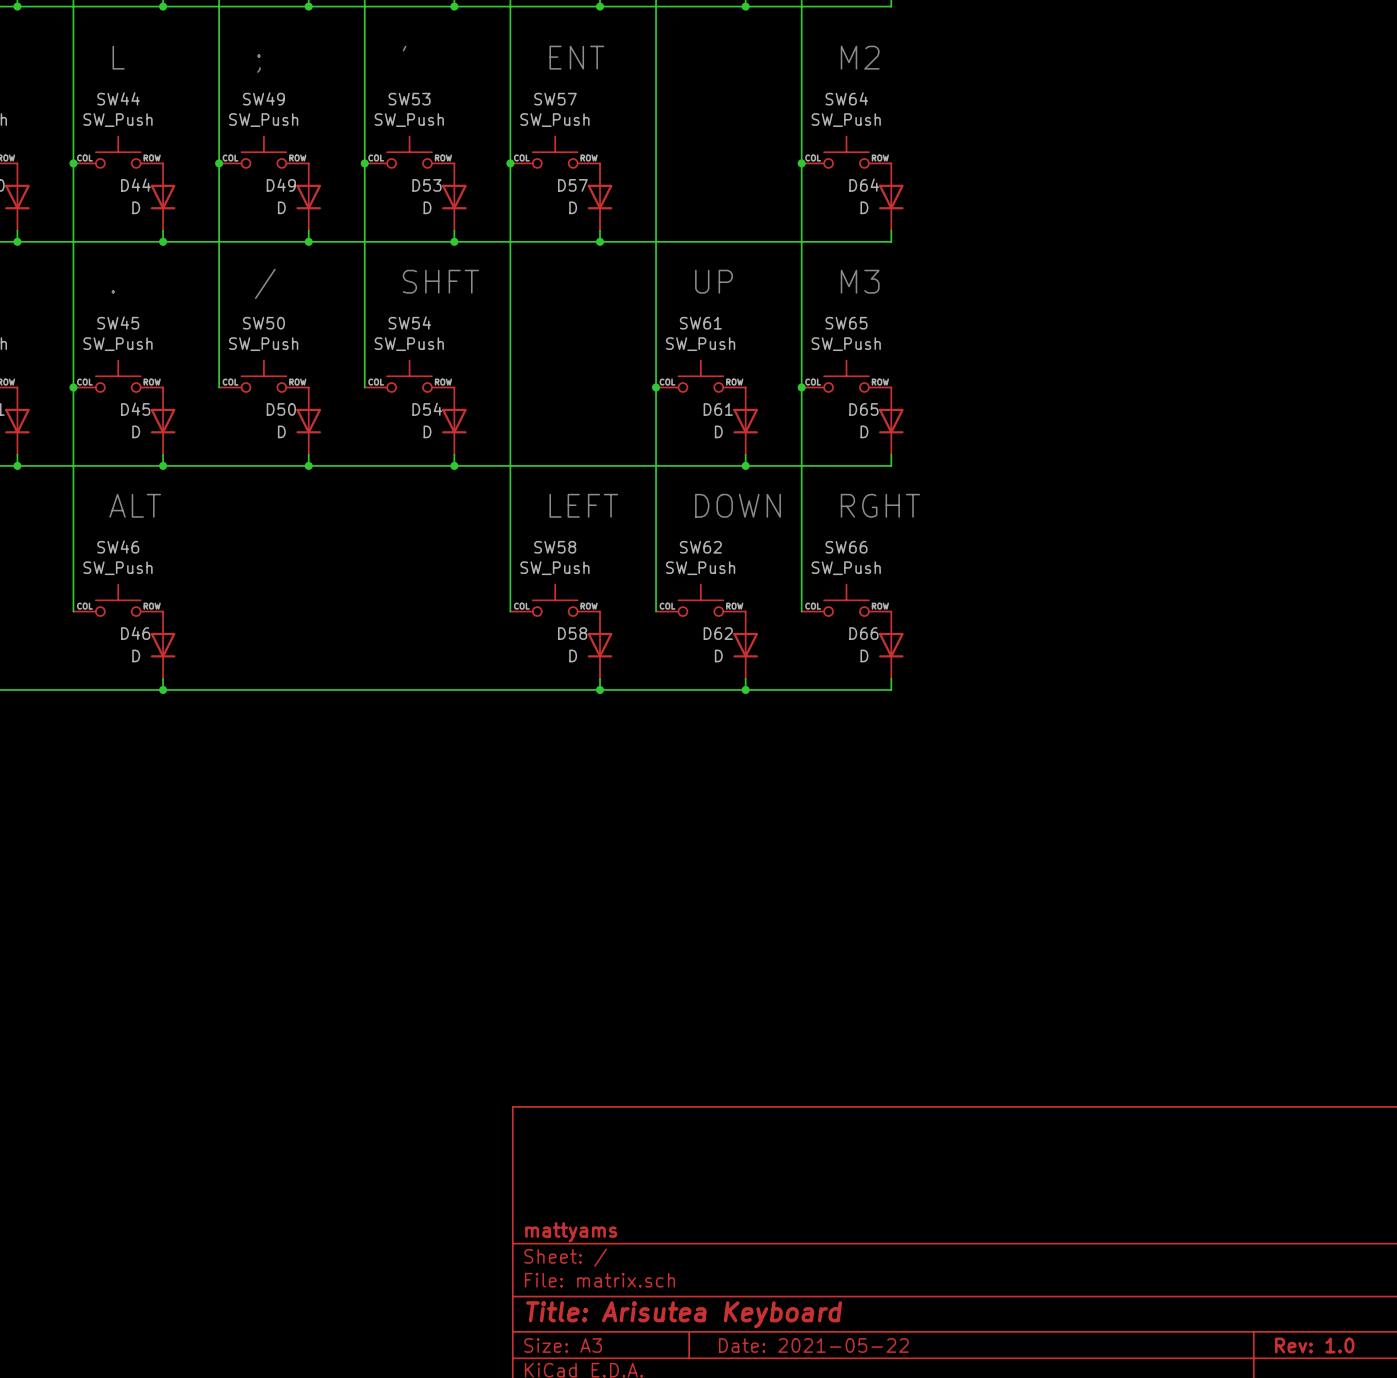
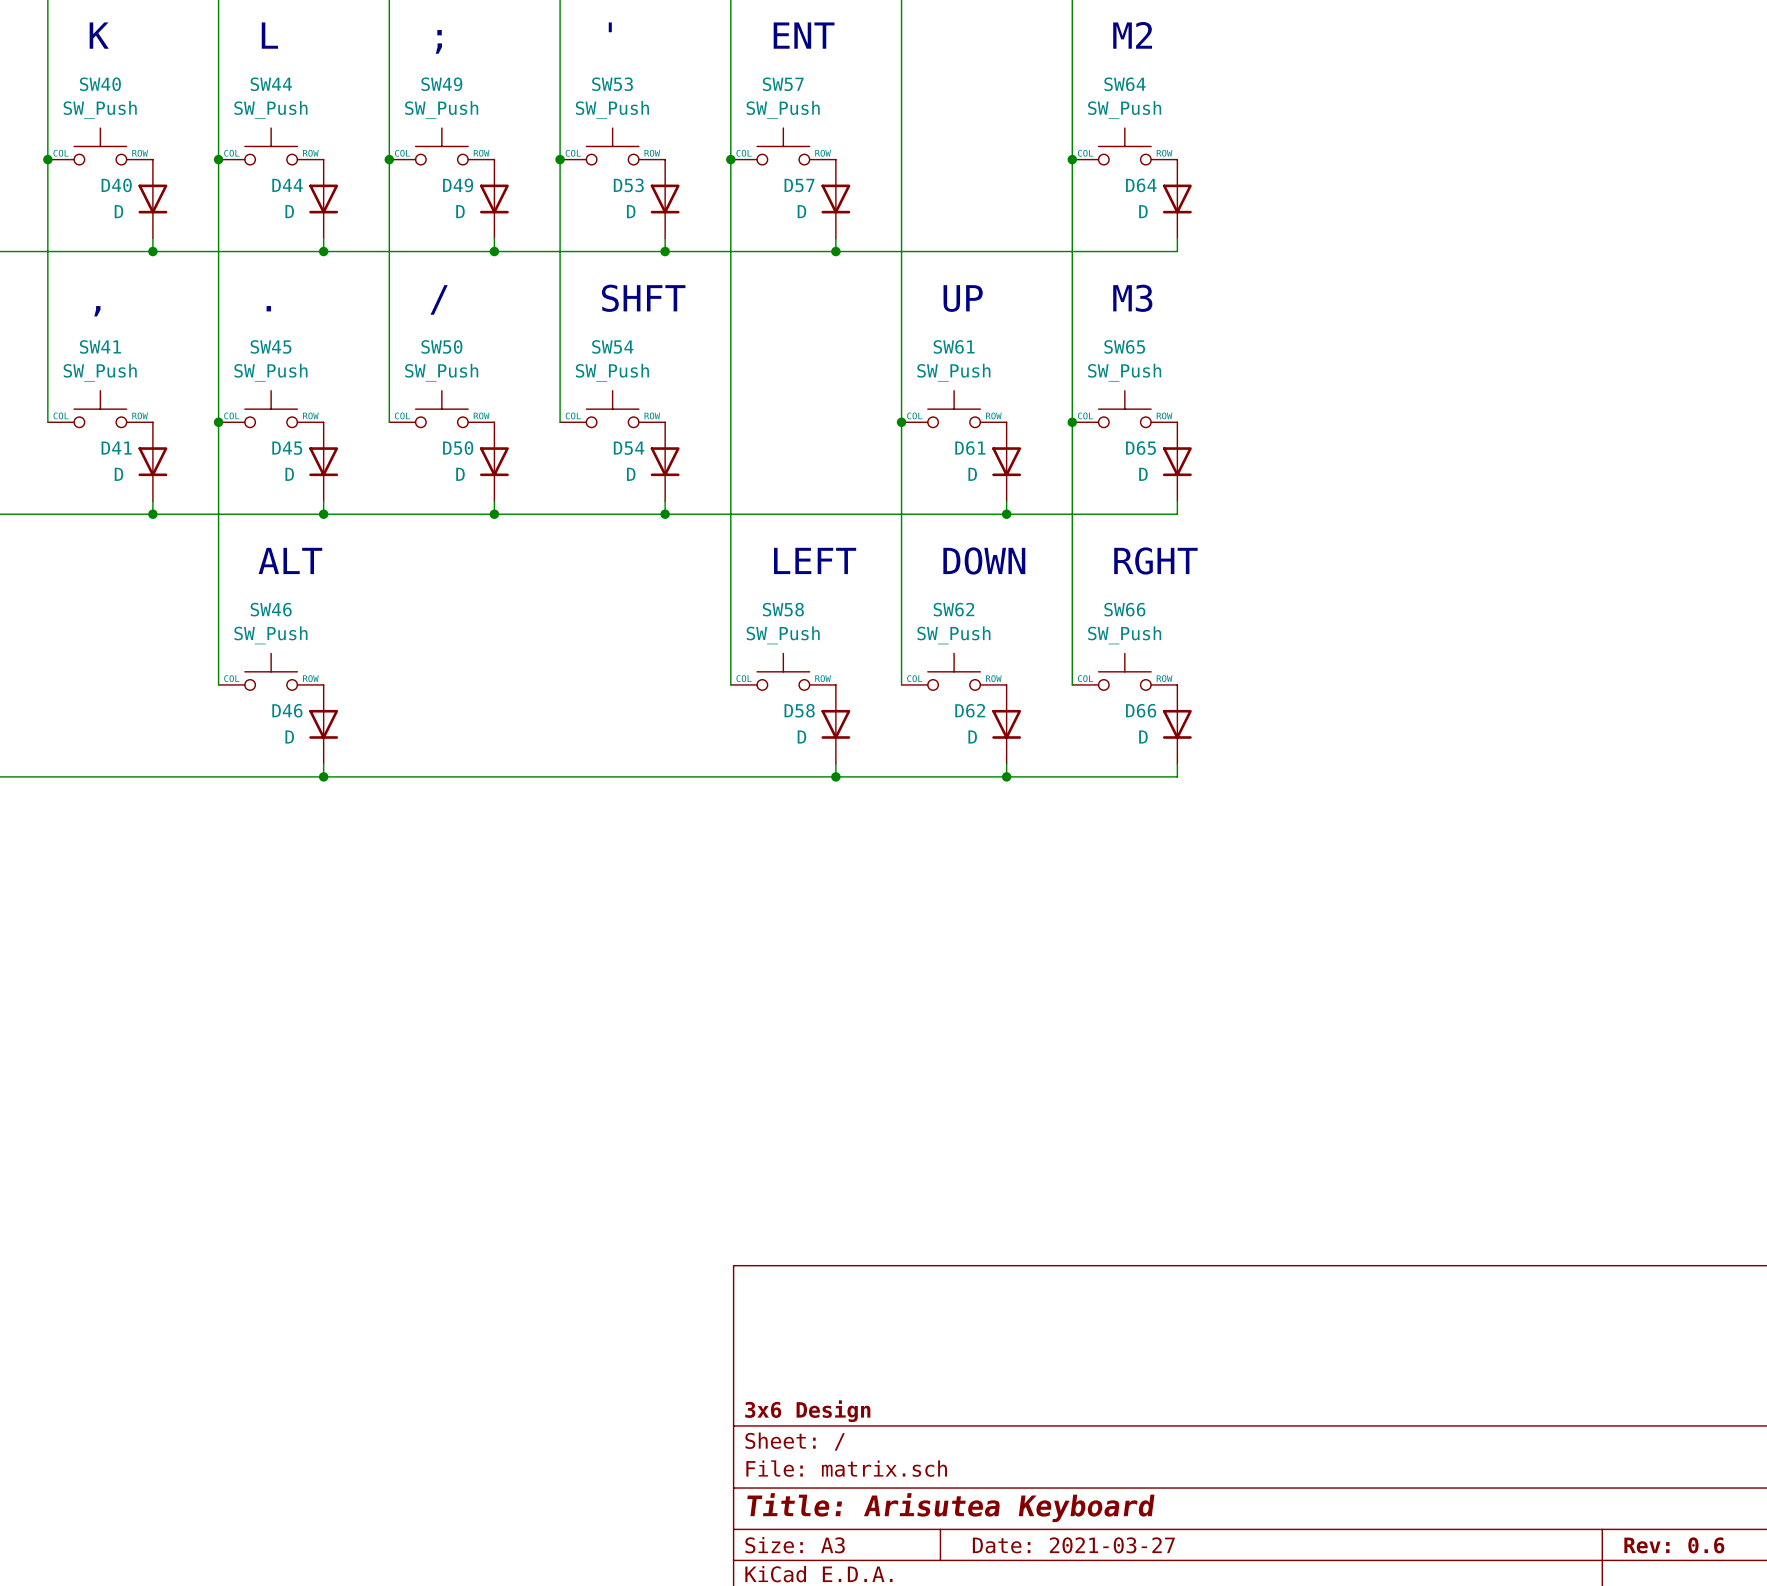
title block: mattyams (571, 1232) -> 3x6 Design (807, 1411)
title block: Date: 2021-05-22 (813, 1345) -> Date: 2021-03-27 (1073, 1545)
title block: Rev: 1.0 (1314, 1345) -> Rev: 0.6 (1674, 1545)

